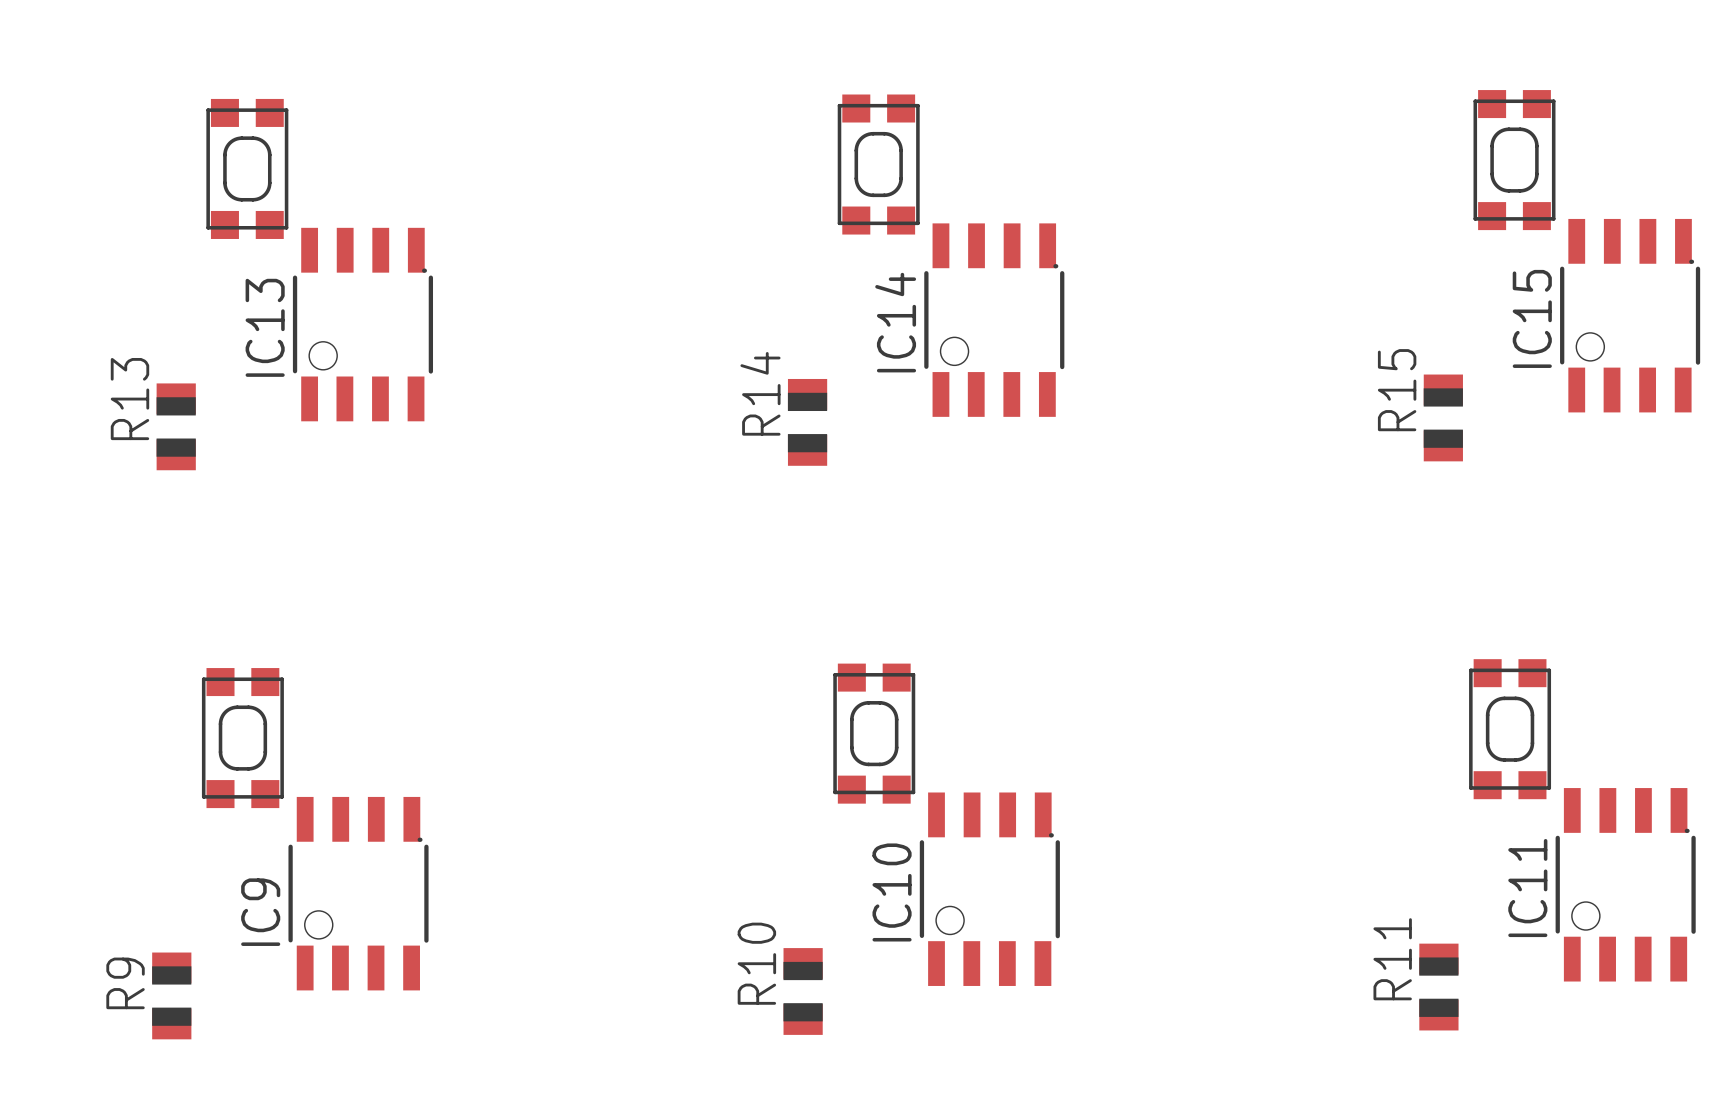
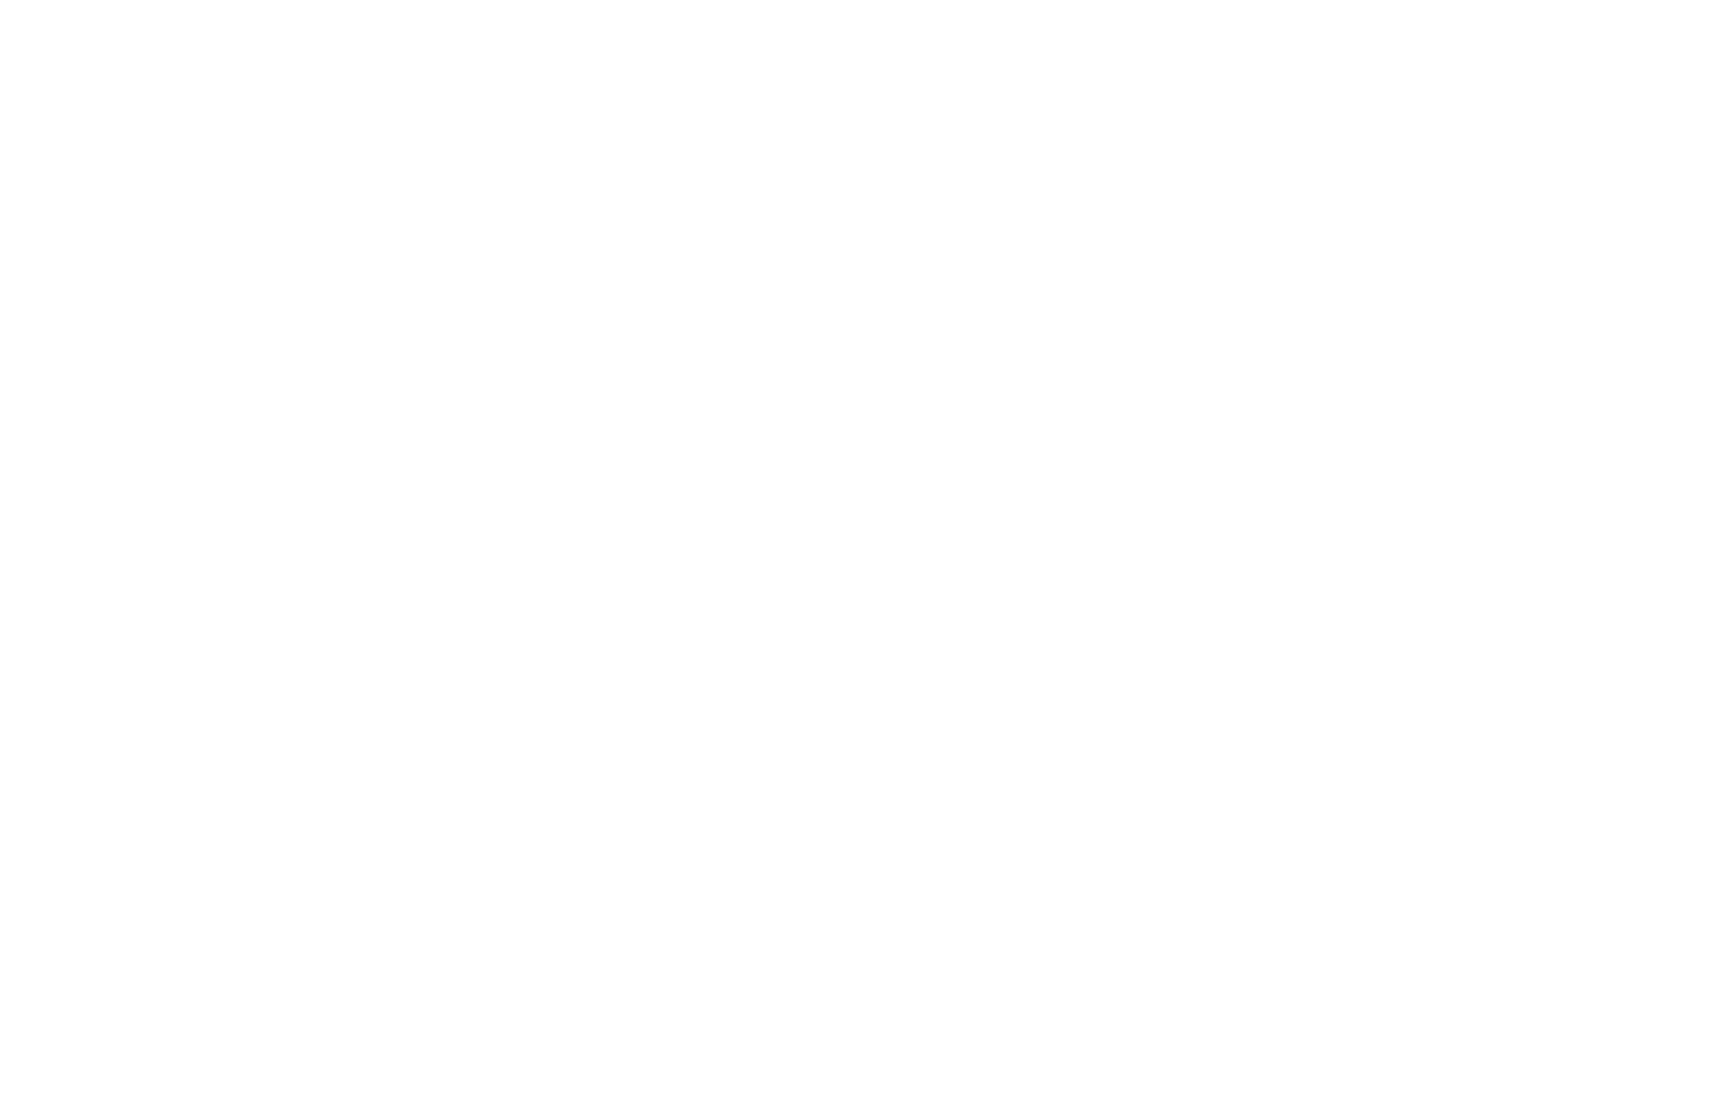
part: (1514, 160) -> none
part: (878, 164) -> none
part: (247, 168) -> none
IC15: (1630, 315) -> none
IC14: (994, 320) -> none
IC13: (362, 324) -> none
R15: (1443, 417) -> none
R14: (807, 422) -> none
R13: (176, 426) -> none
part: (1510, 729) -> none
part: (874, 733) -> none
part: (242, 738) -> none
IC11: (1625, 884) -> none
IC10: (989, 889) -> none
IC9: (358, 893) -> none
R11: (1438, 987) -> none
R10: (803, 991) -> none
R9: (171, 995) -> none

